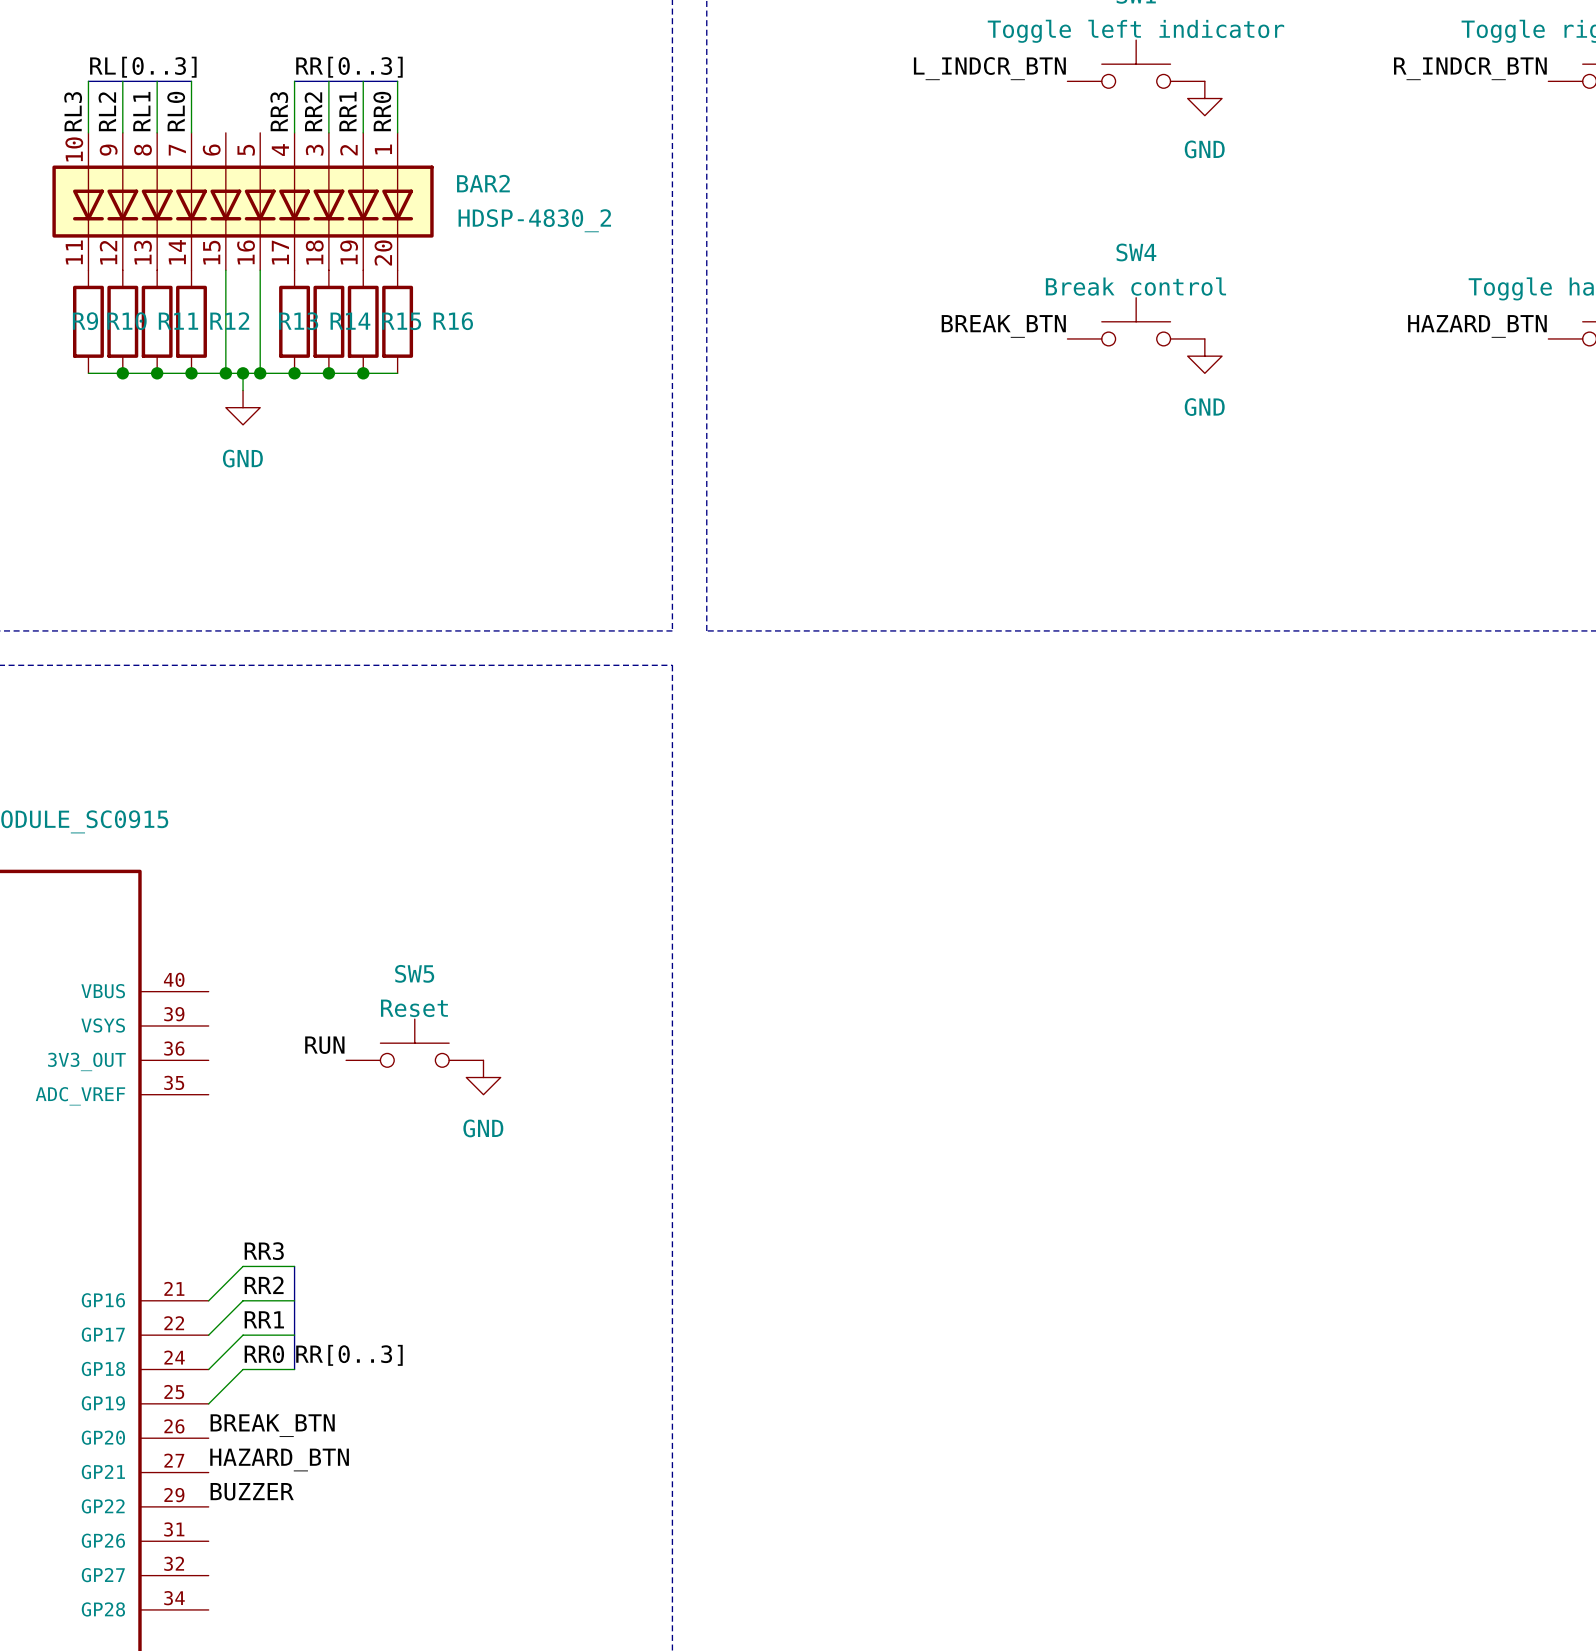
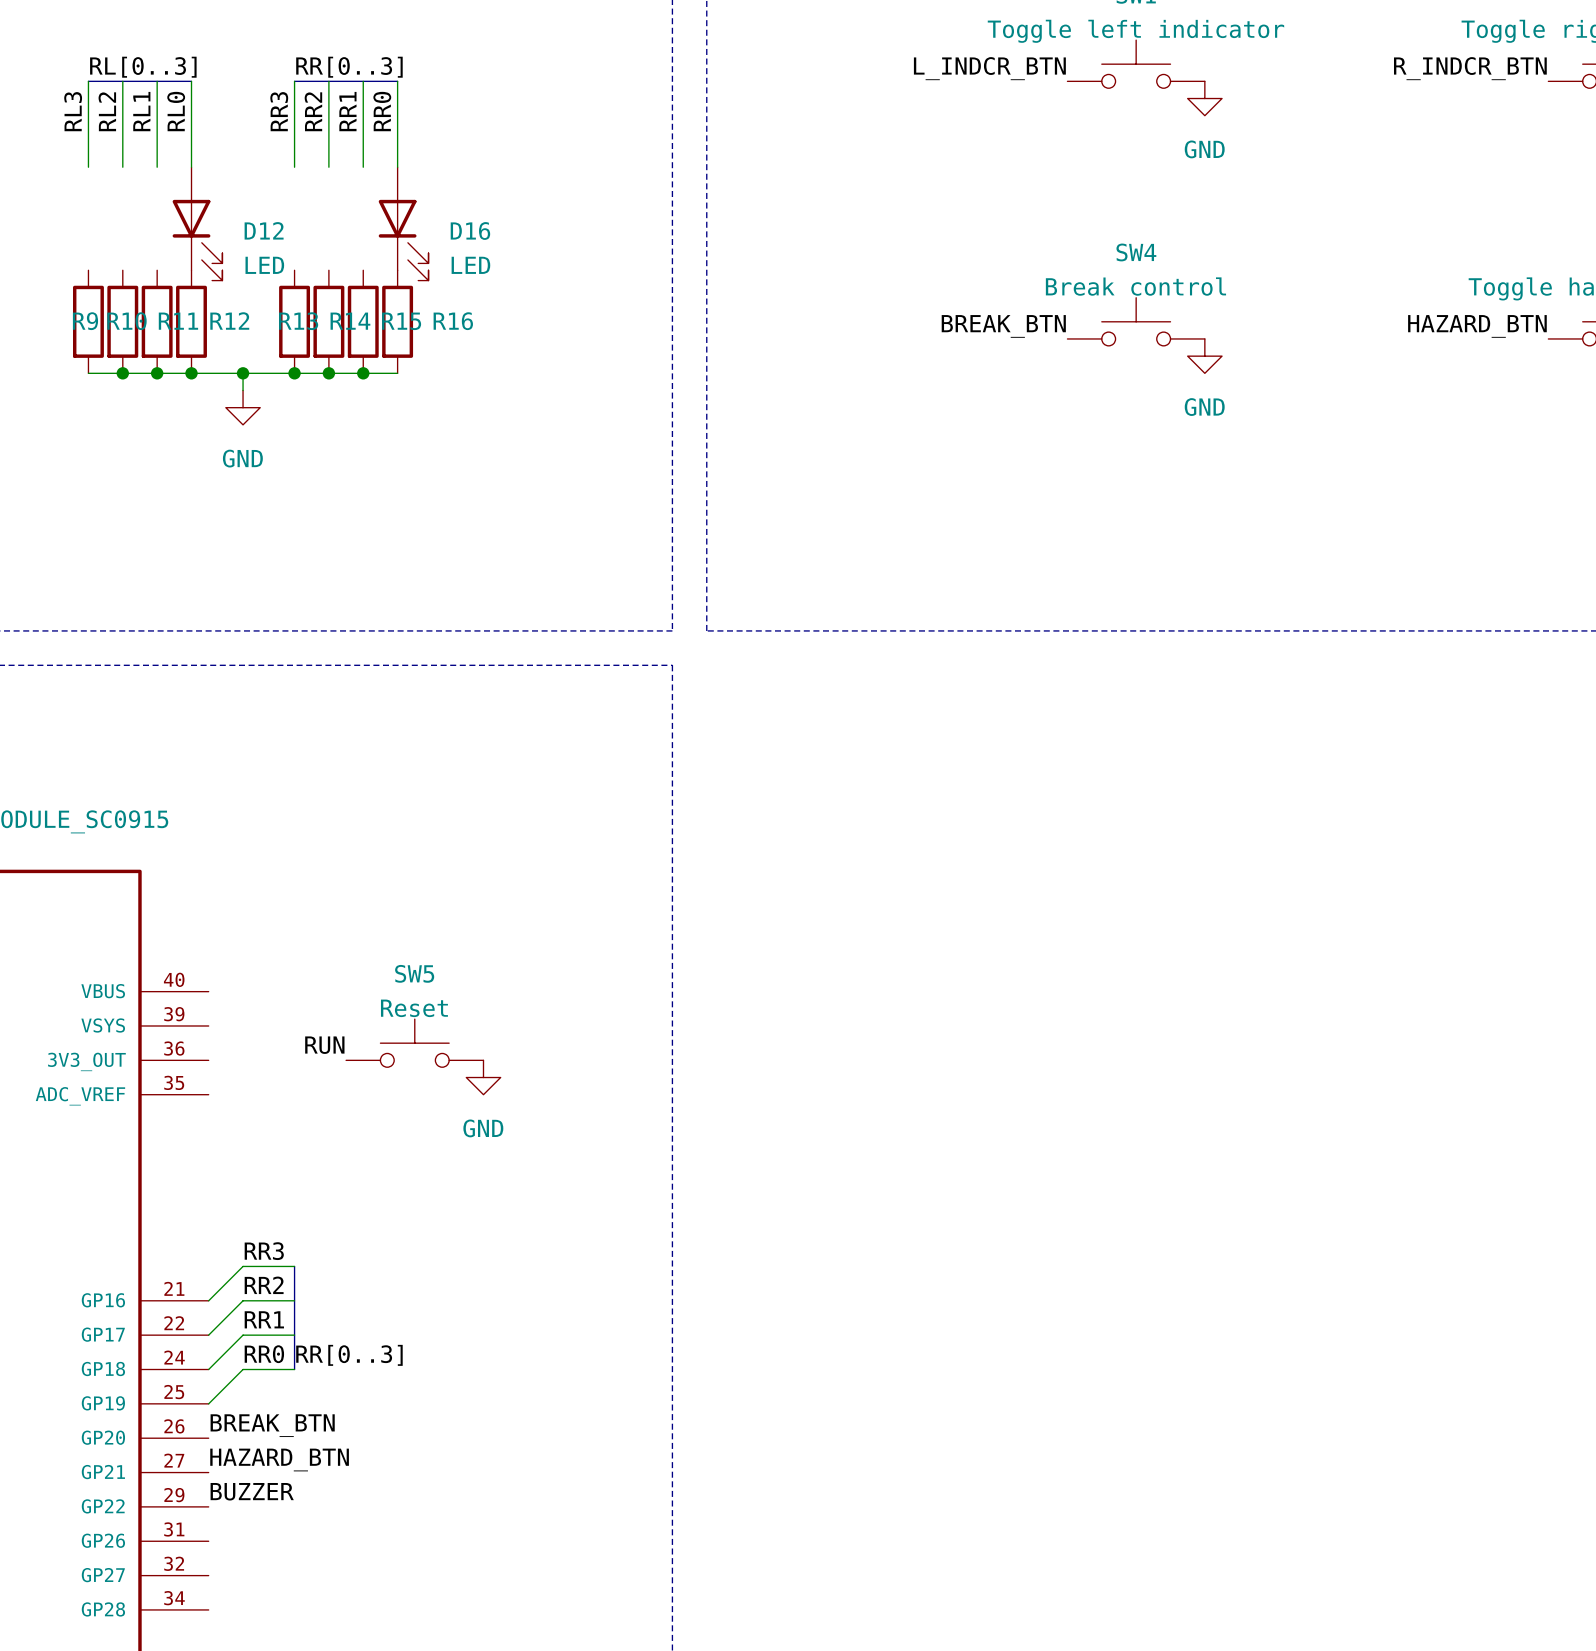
BAR2: HDSP-4830_2 (243, 201) -> none
D12: none -> LED (197, 223)
D16: none -> LED (403, 223)
wire: (225, 270) (225, 373) -> none
wire: (260, 270) (260, 373) -> none
junction: (225, 373) -> none
junction: (260, 373) -> none

